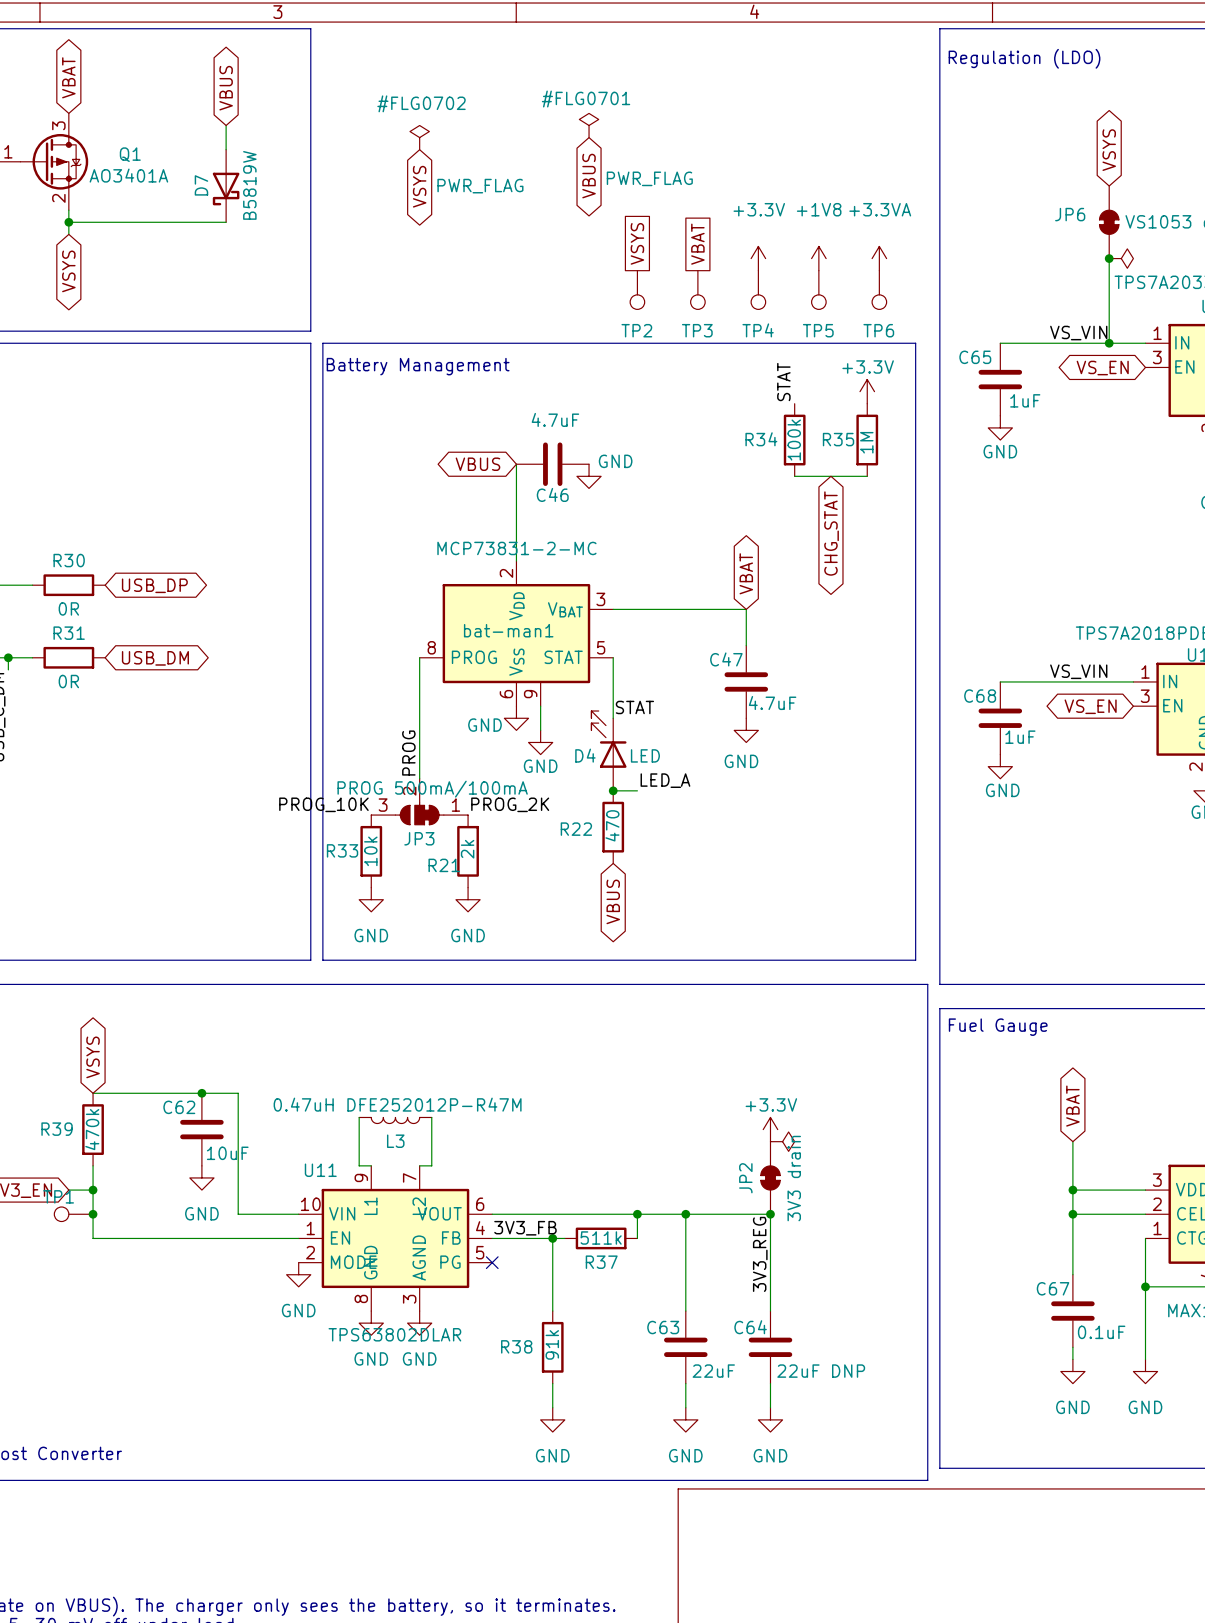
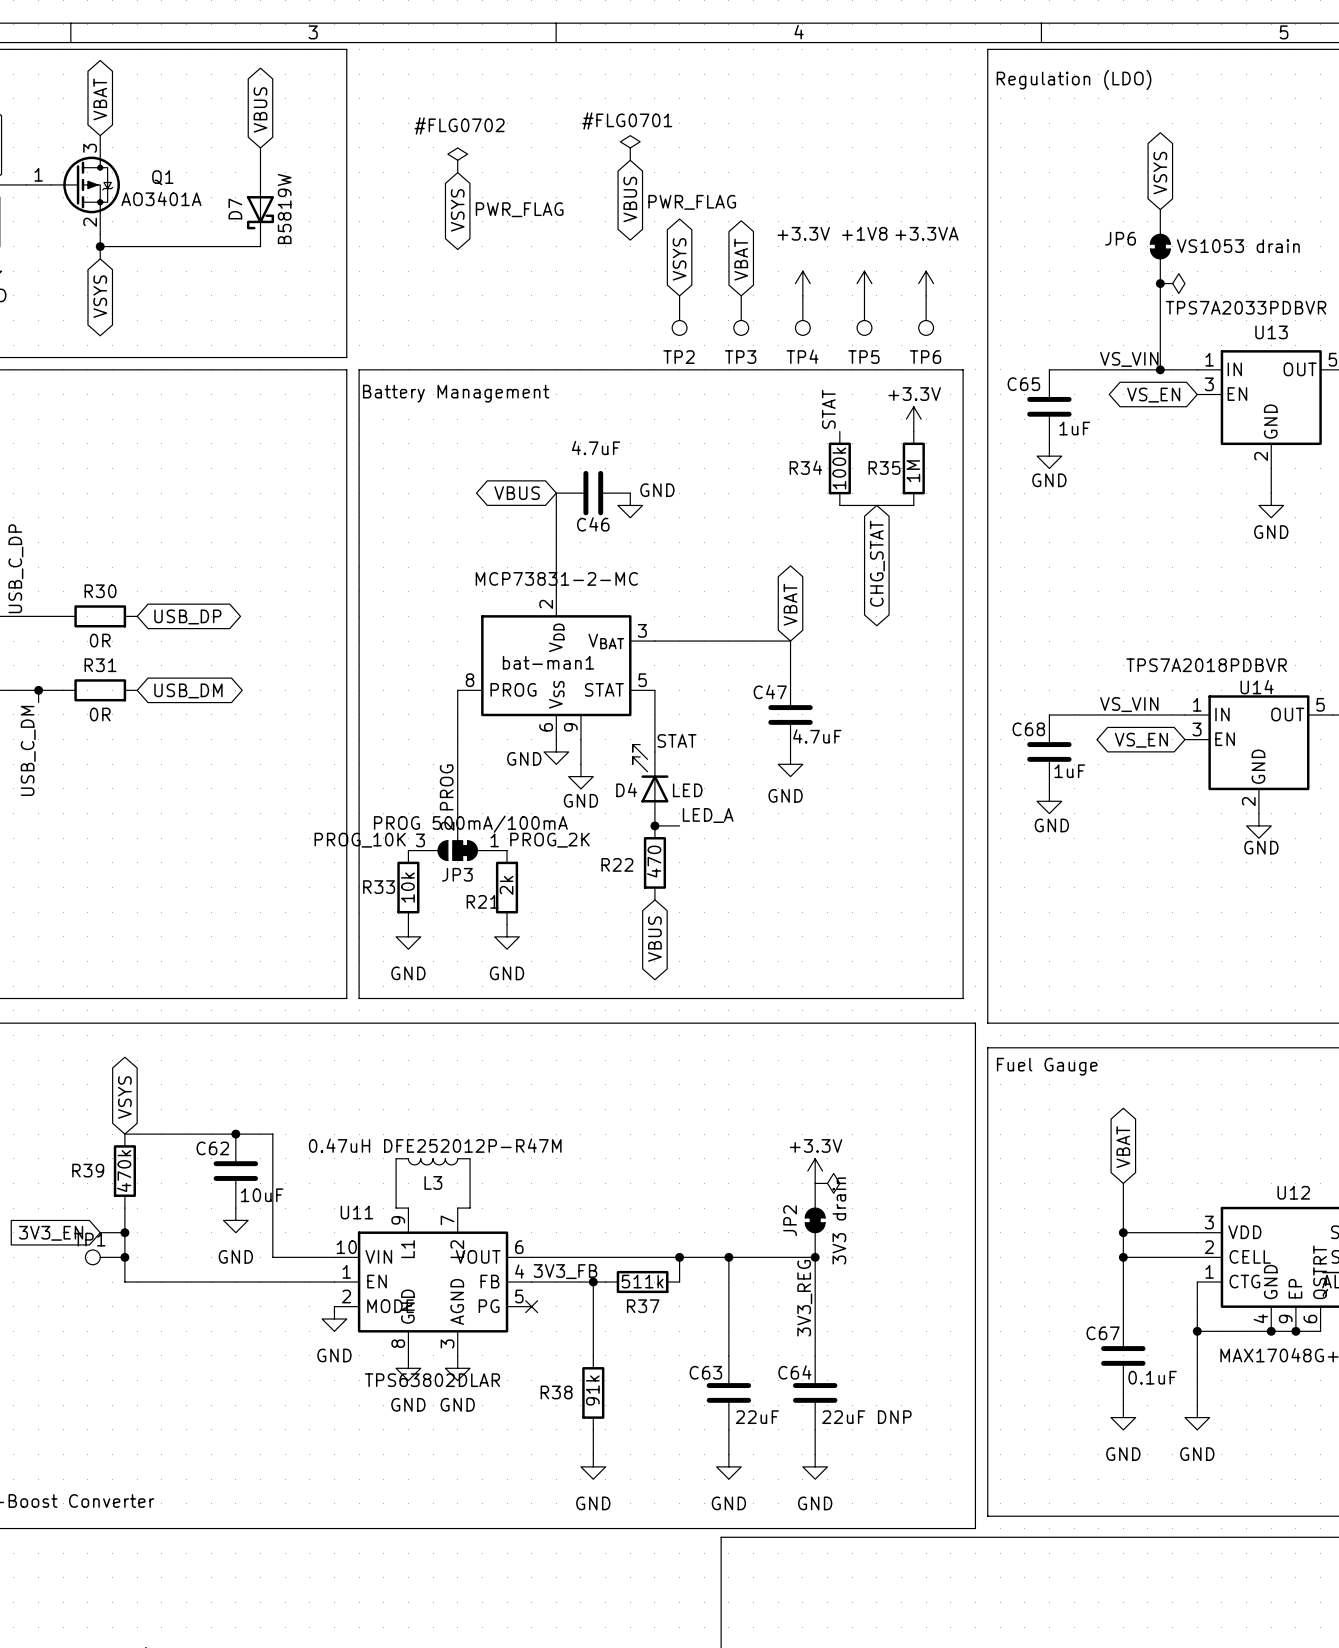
global label shape: passive (637, 243) -> bidirectional (679, 259)
global label shape: passive (697, 244) -> bidirectional (741, 259)

